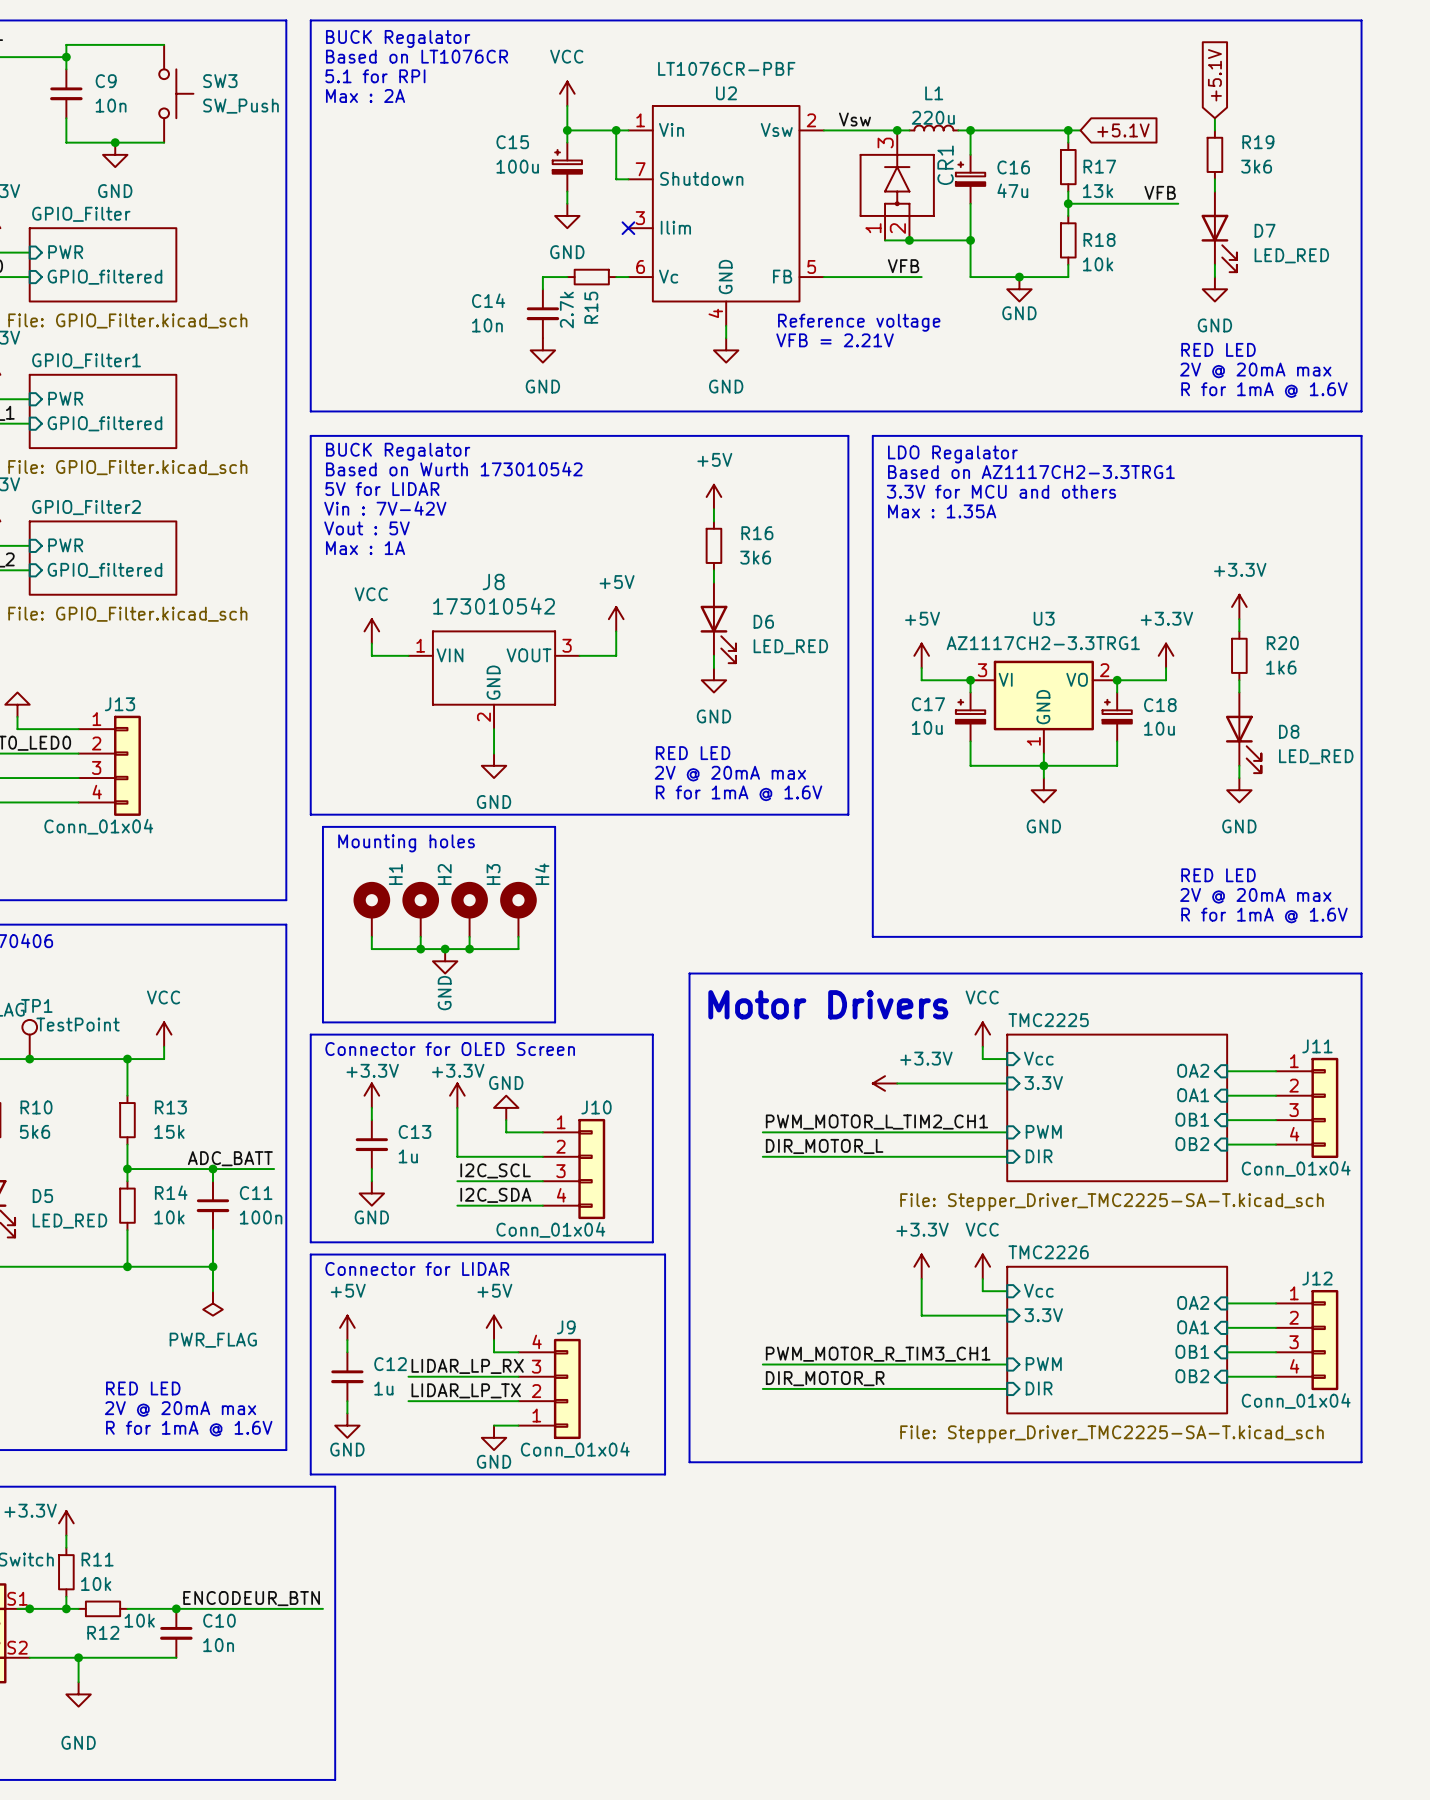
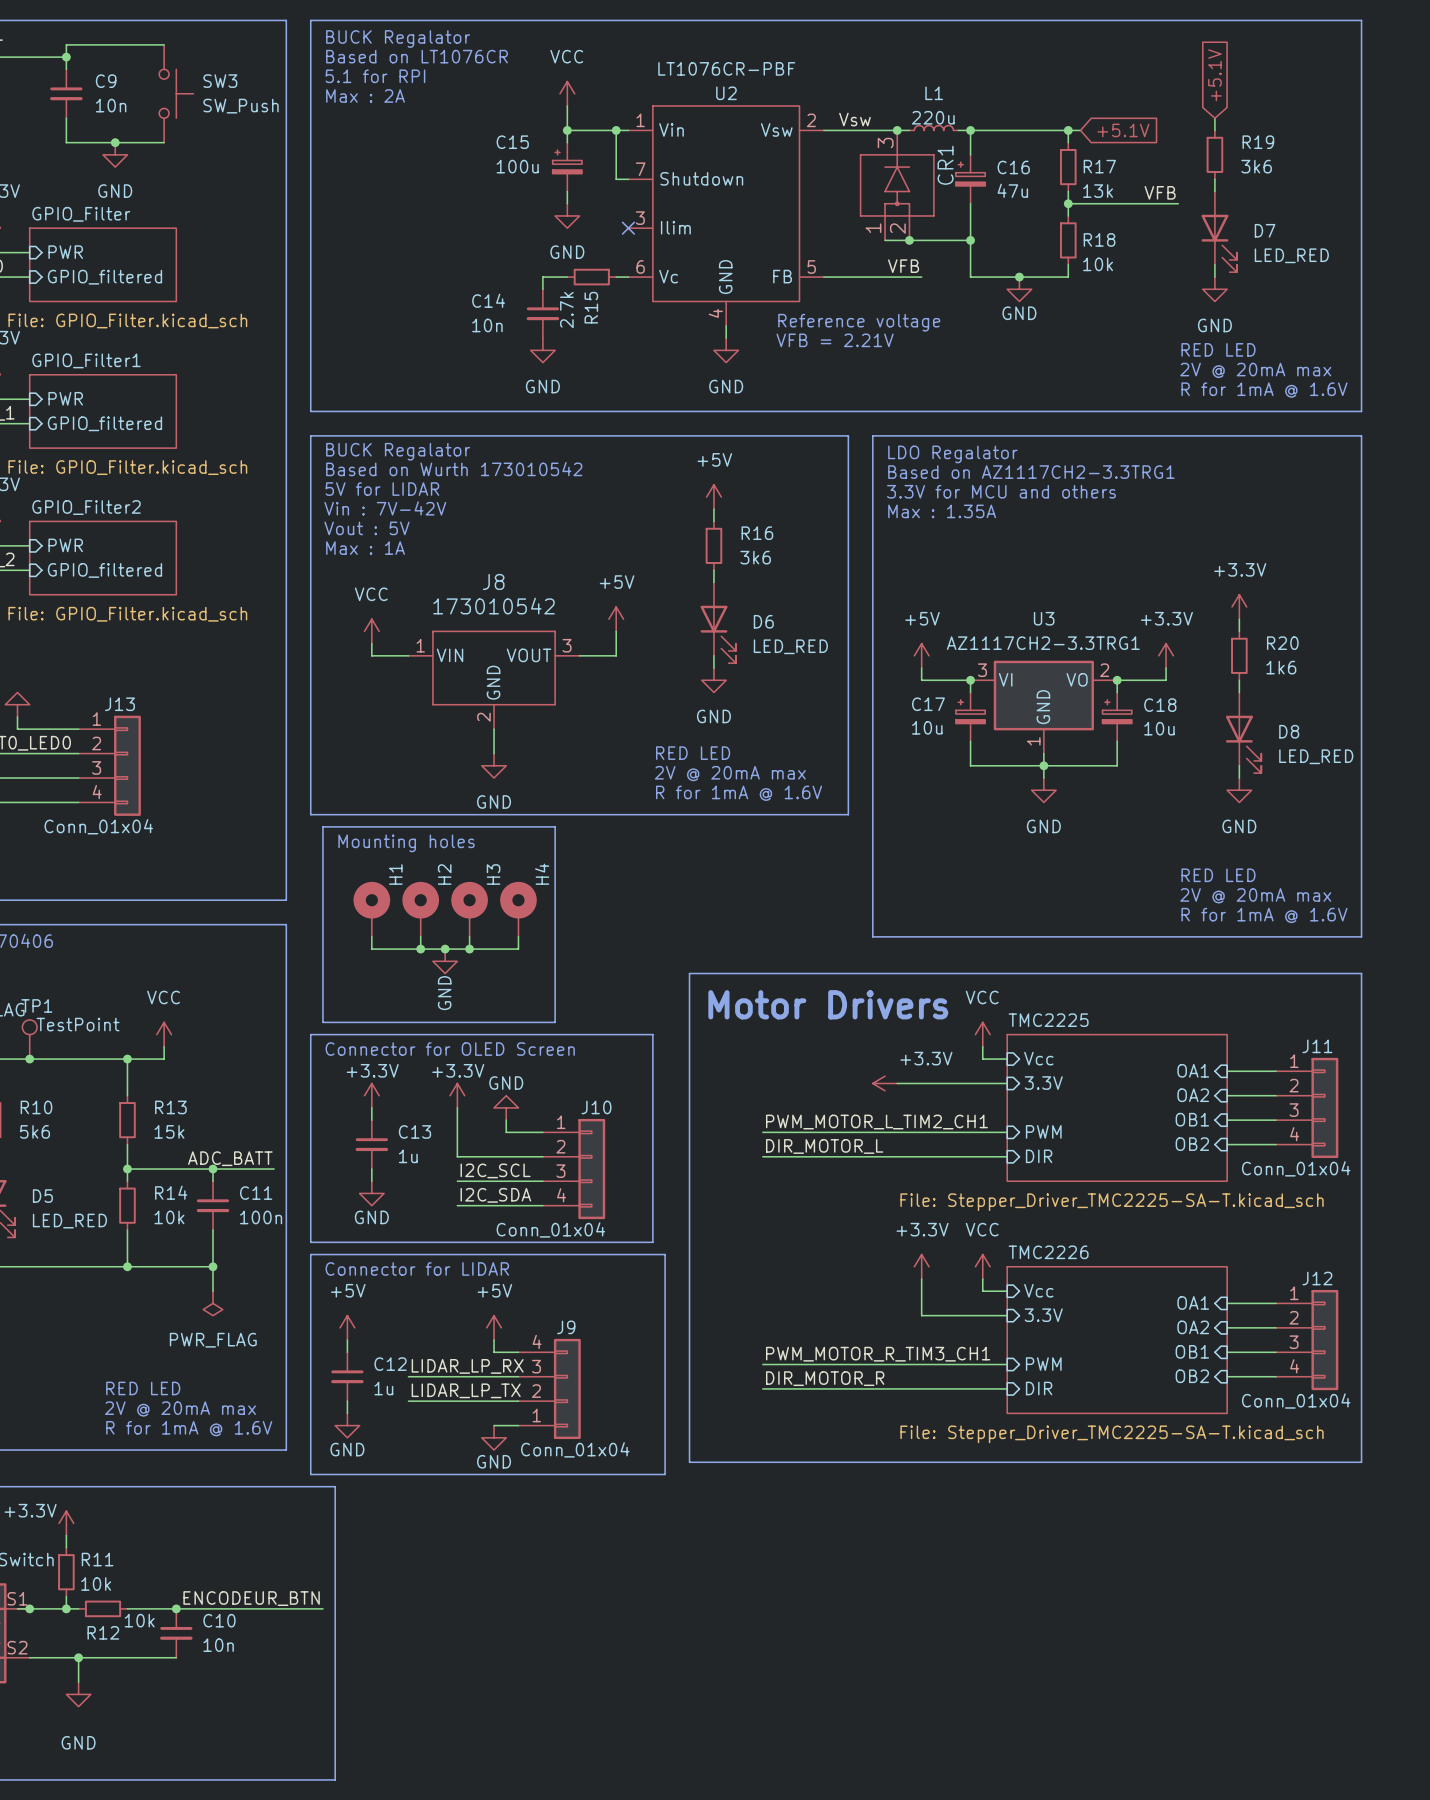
sheet pin: OA2 (1193, 1070) -> OA1 (1193, 1070)
sheet pin: OA1 (1193, 1095) -> OA2 (1193, 1095)
sheet pin: OA2 (1193, 1302) -> OA1 (1193, 1302)
sheet pin: OA1 (1193, 1327) -> OA2 (1193, 1327)

